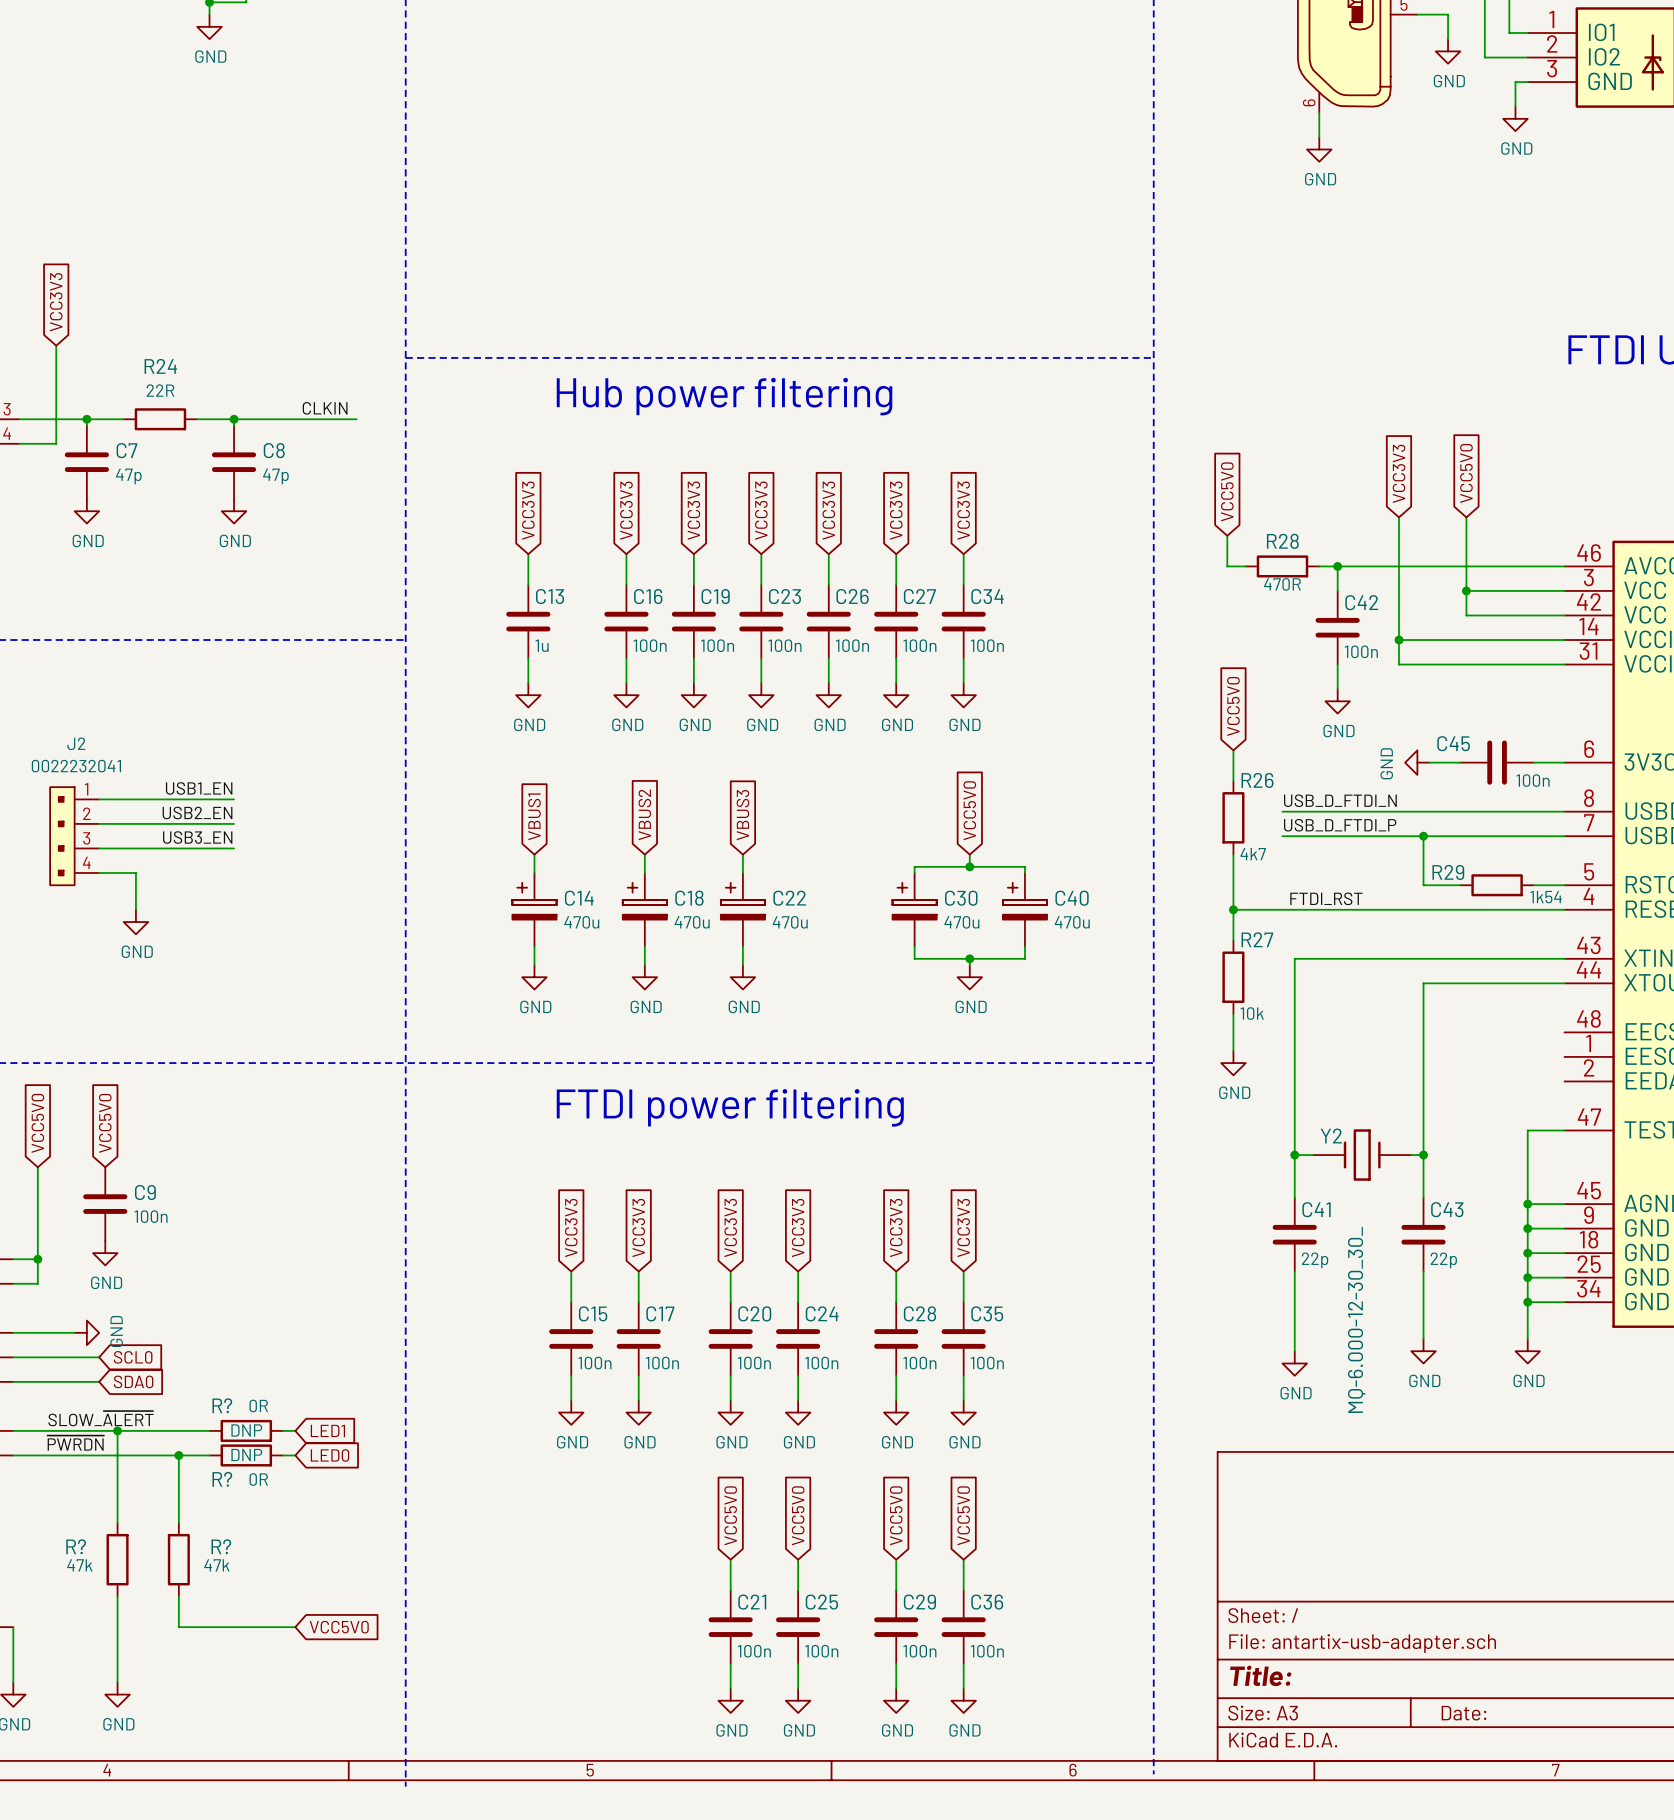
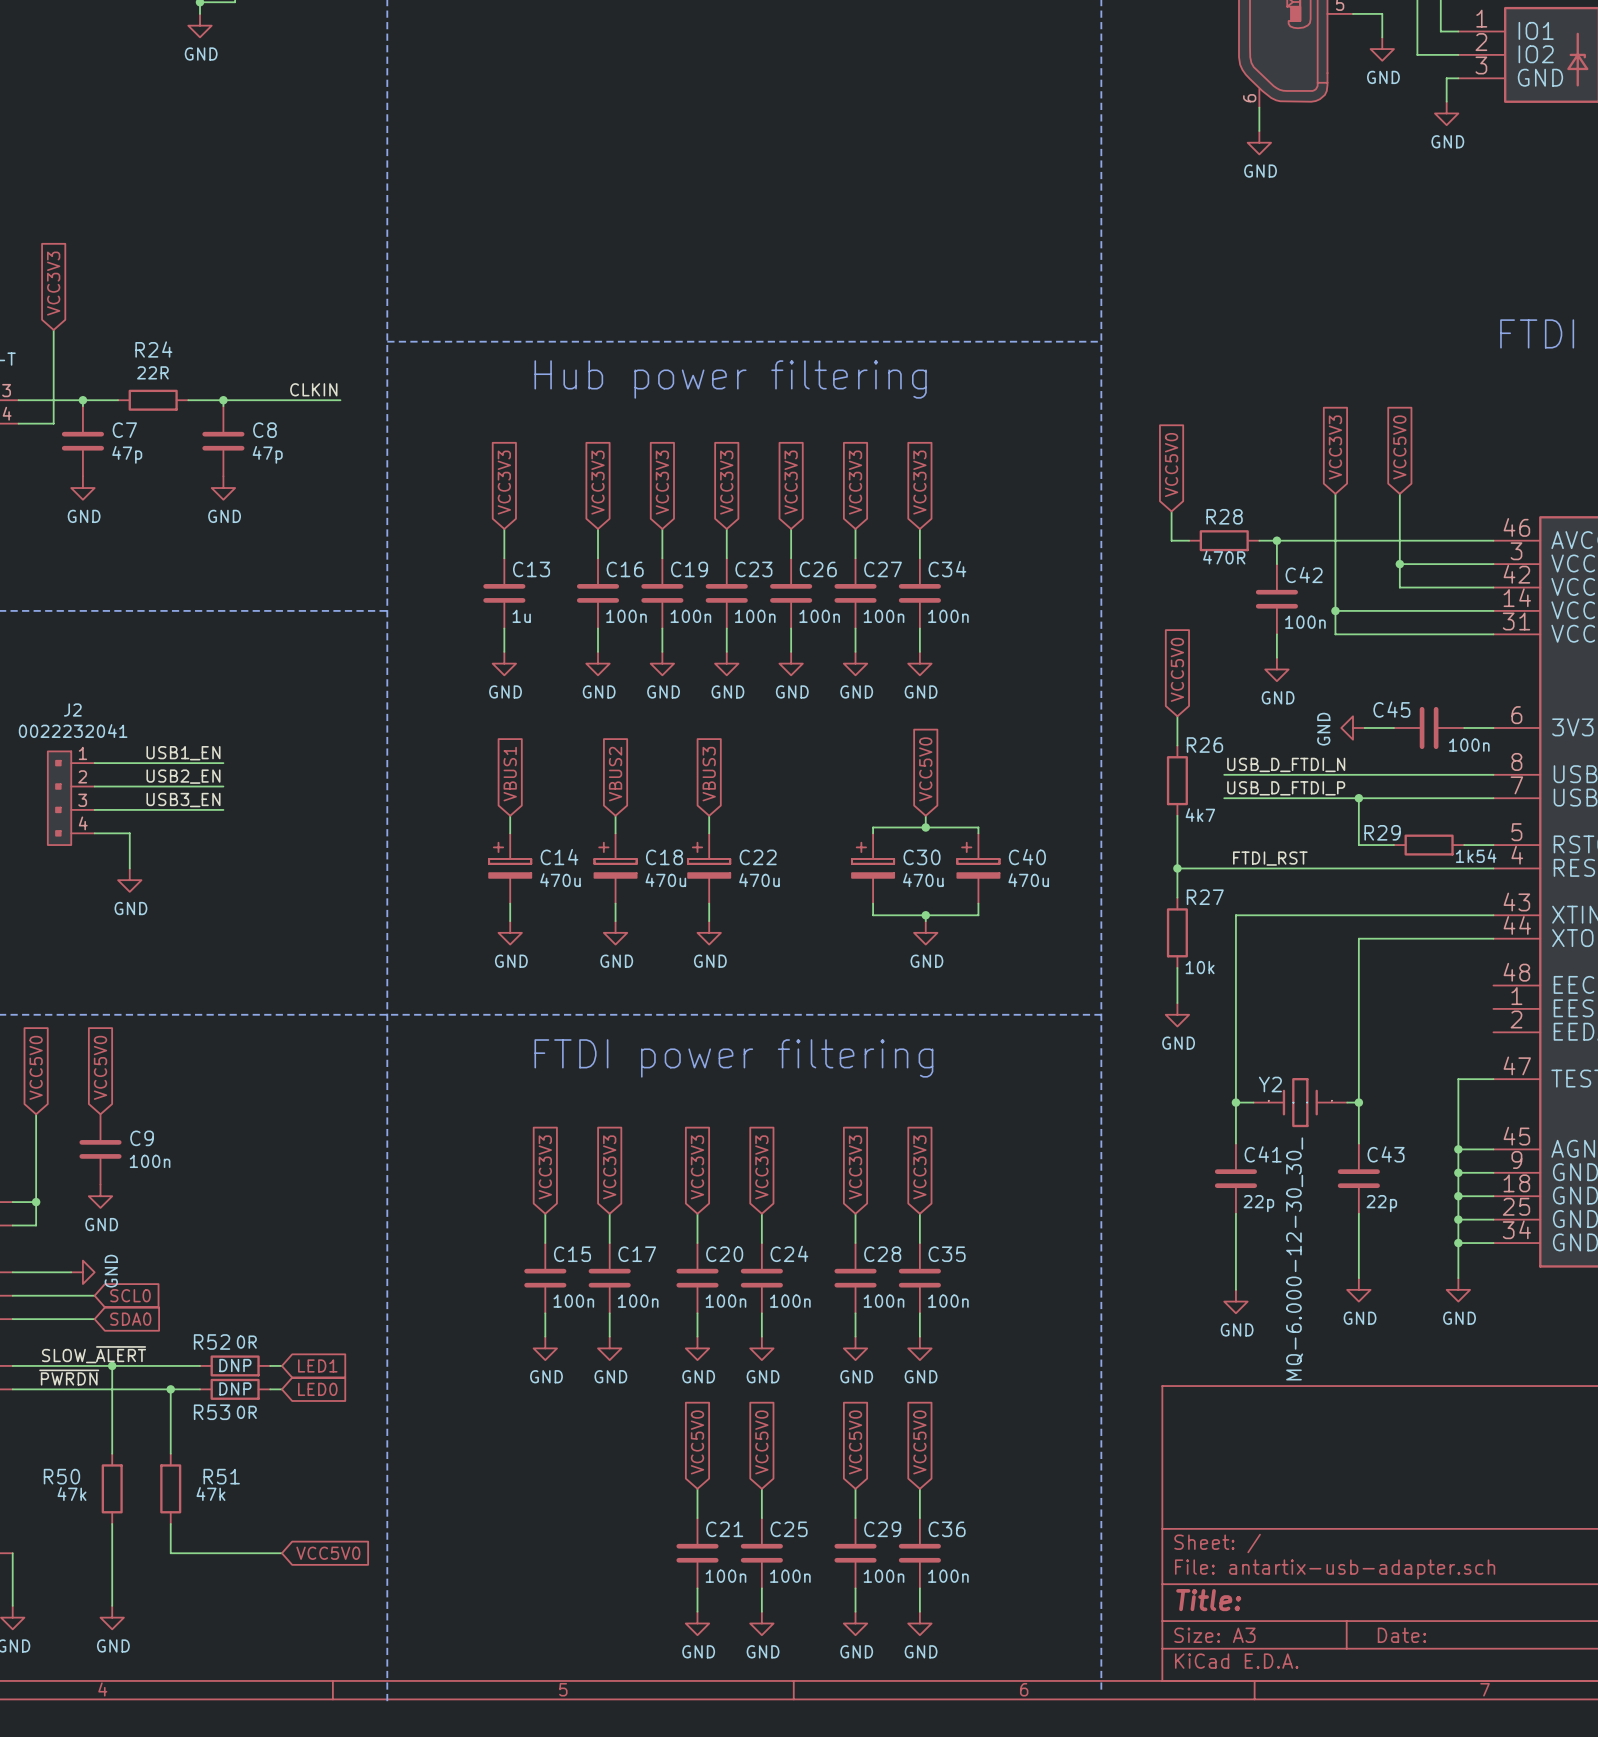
R? name: R? (222, 1405) -> R52 (212, 1342)
R? name: R? (222, 1479) -> R53 (212, 1412)
R? name: R? (76, 1546) -> R50 (61, 1476)
R? name: R? (221, 1546) -> R51 (221, 1476)

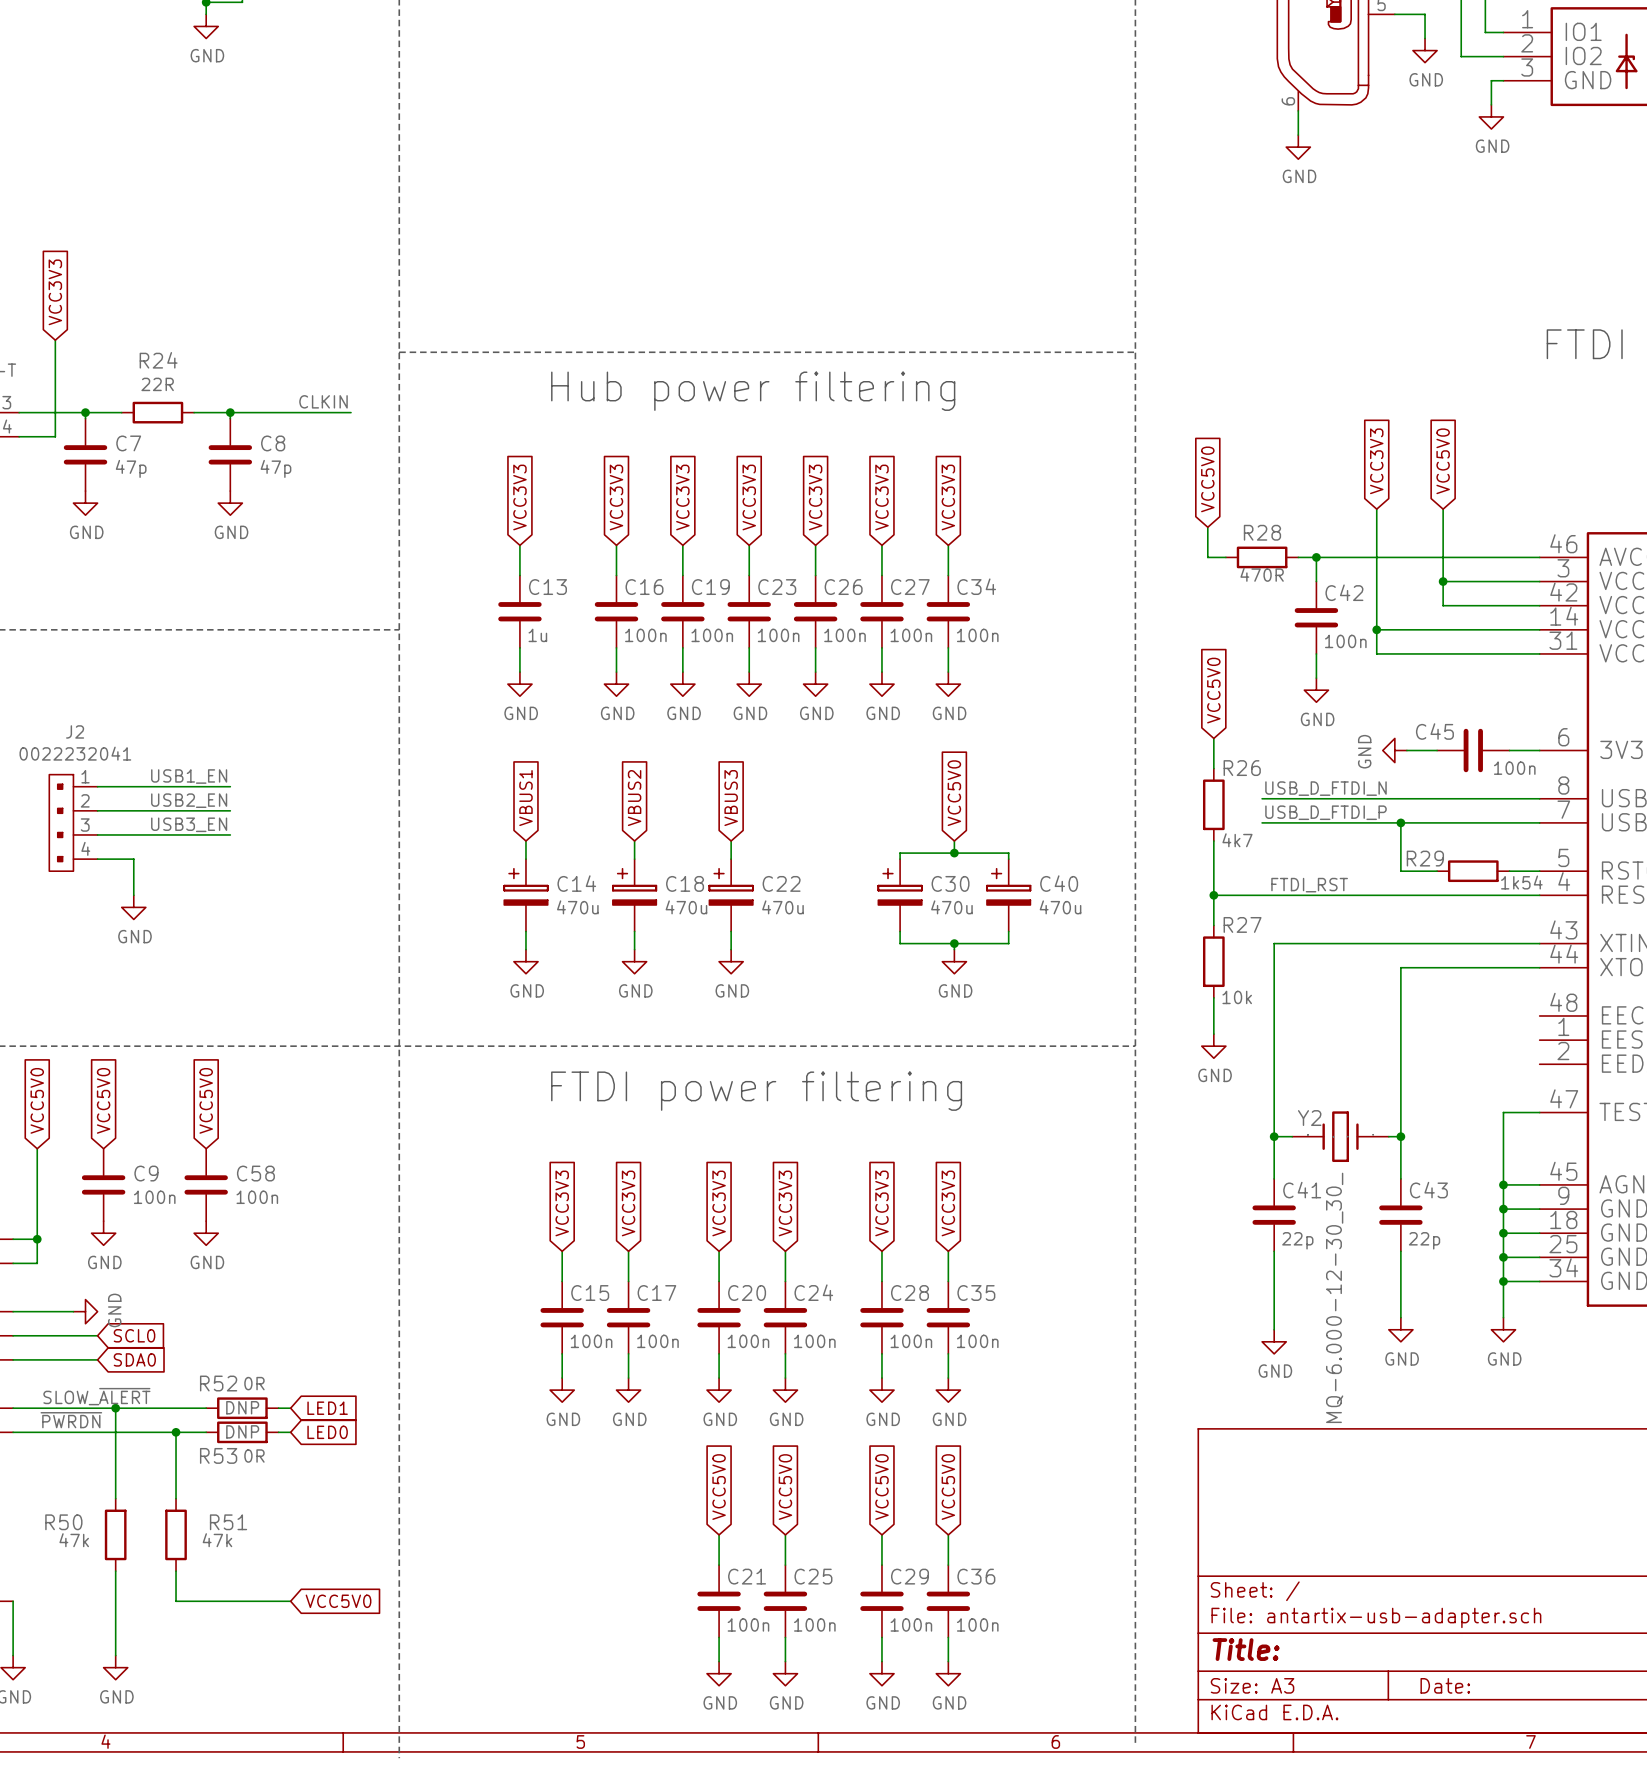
global label: none -> VCC5V0 (206, 1100)
C58: none -> (206, 1184)
power symbol: none -> GND (206, 1233)

